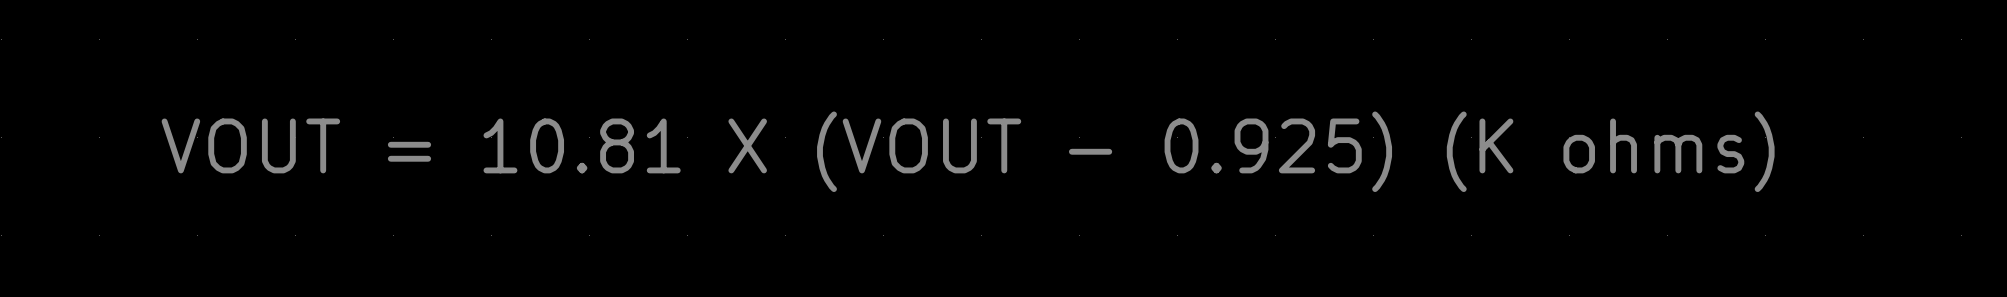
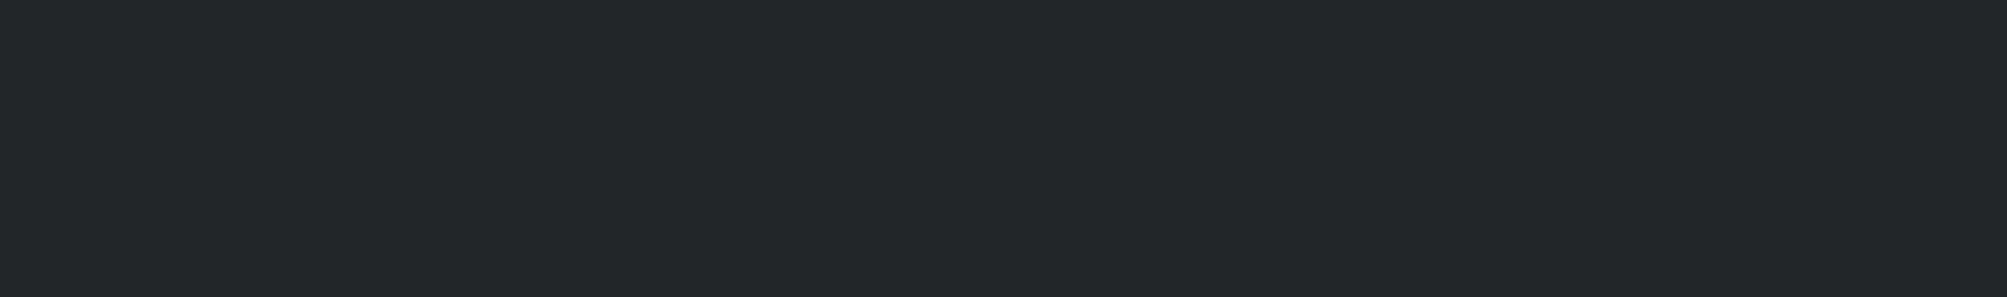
text: VOUT = 10.81 X (VOUT - 0.925) (K ohms) (968, 151) -> none

